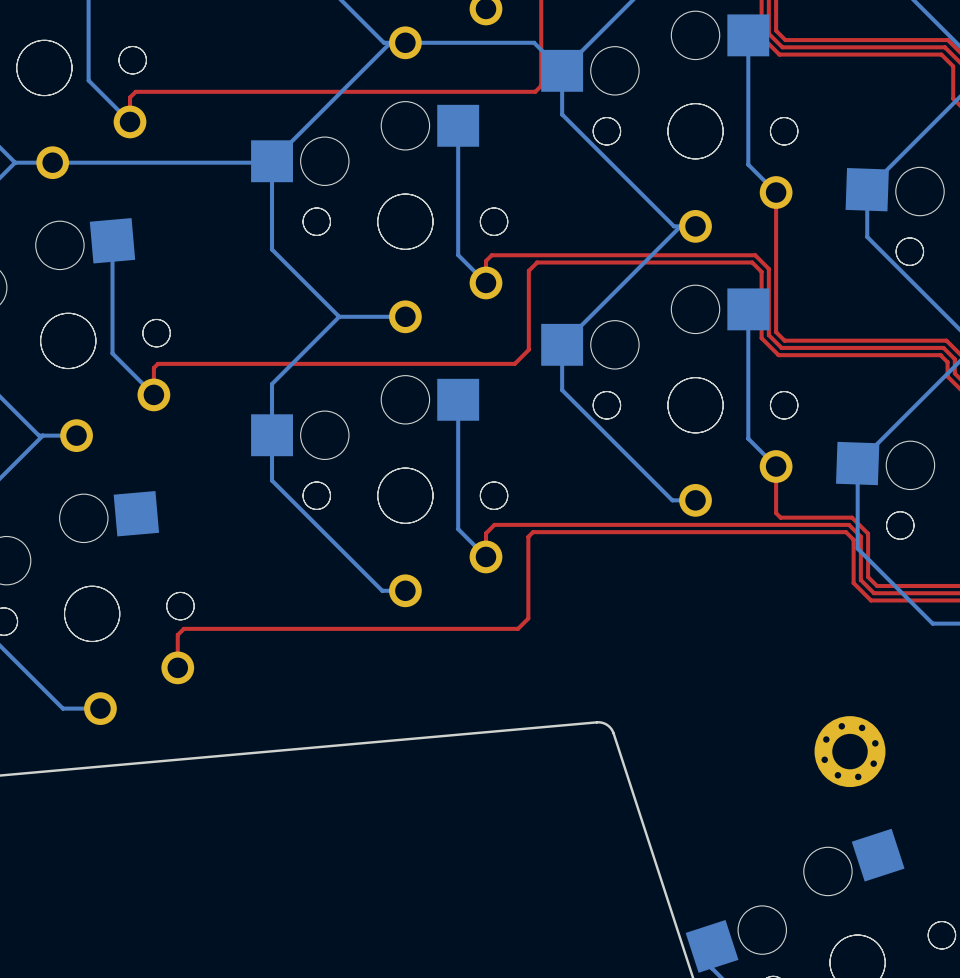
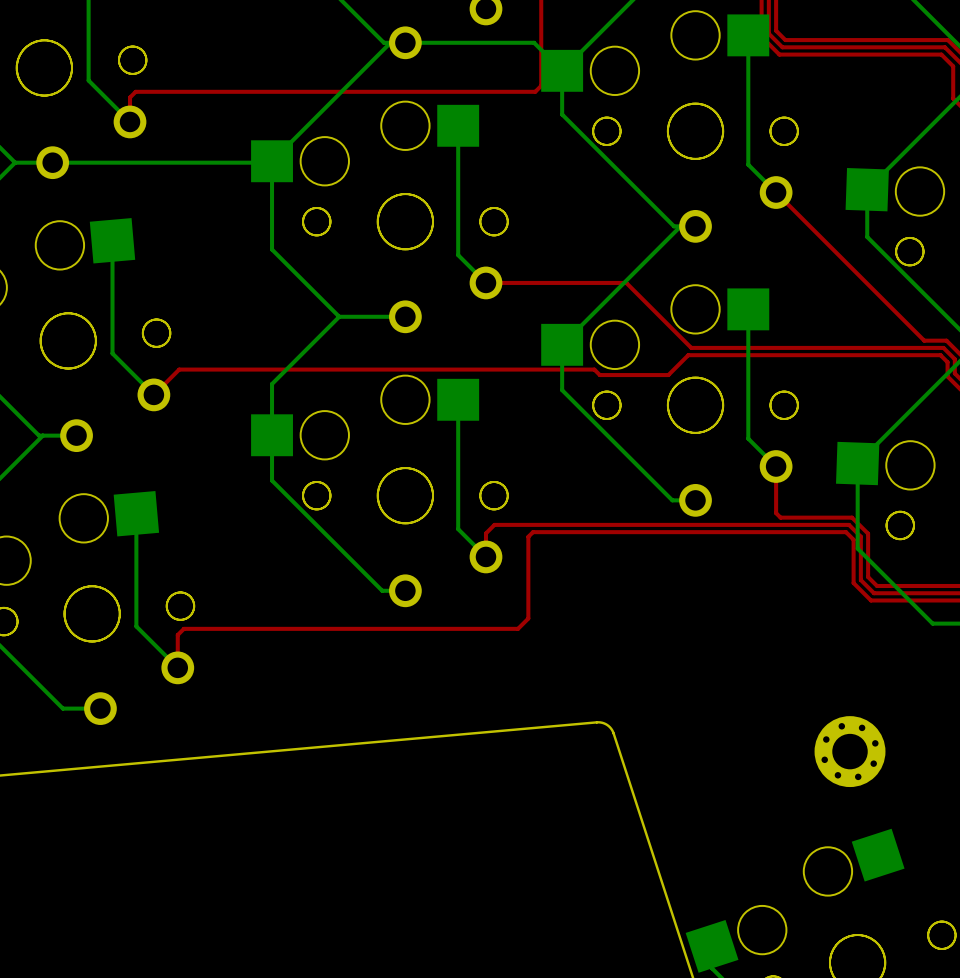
top track: (776, 192) (776, 332) (784, 340) (924, 340) -> (776, 192) (924, 340)
top track: (485, 282) (485, 261) (491, 255) (755, 255) (768, 268) (768, 335) (781, 347) -> (485, 282) (626, 282) (691, 347) (781, 347)
top track: (778, 355) (761, 338) (761, 271) (752, 262) (537, 262) (528, 270) (528, 349) (514, 363) (157, 363) (153, 367) (153, 394) -> (778, 355) (688, 355) (668, 375) (599, 375) (594, 369) (179, 369) (153, 394)
bottom track: none -> (136, 513) (136, 626) (177, 667)

